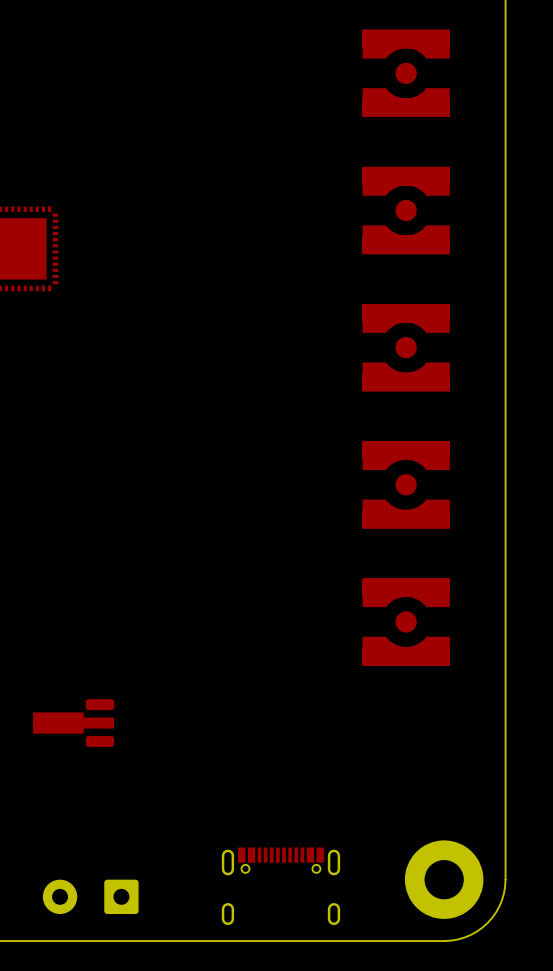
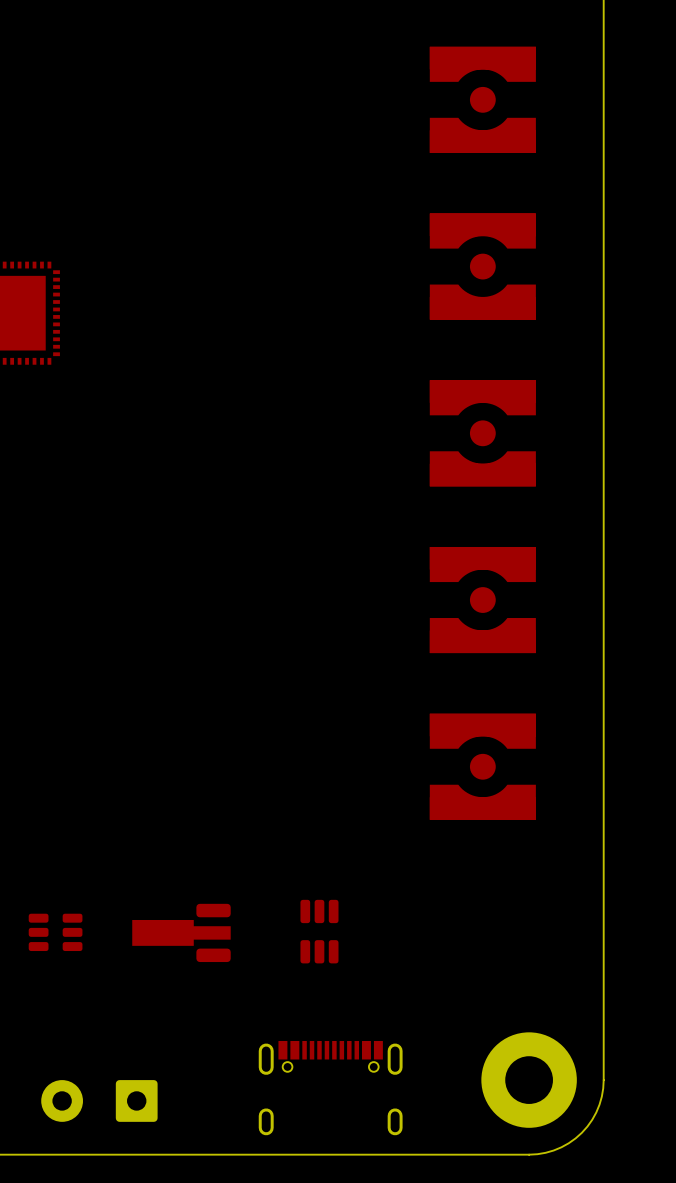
part position: (73, 723) -> (181, 932)
part: none -> (319, 931)
part: none -> (55, 932)

